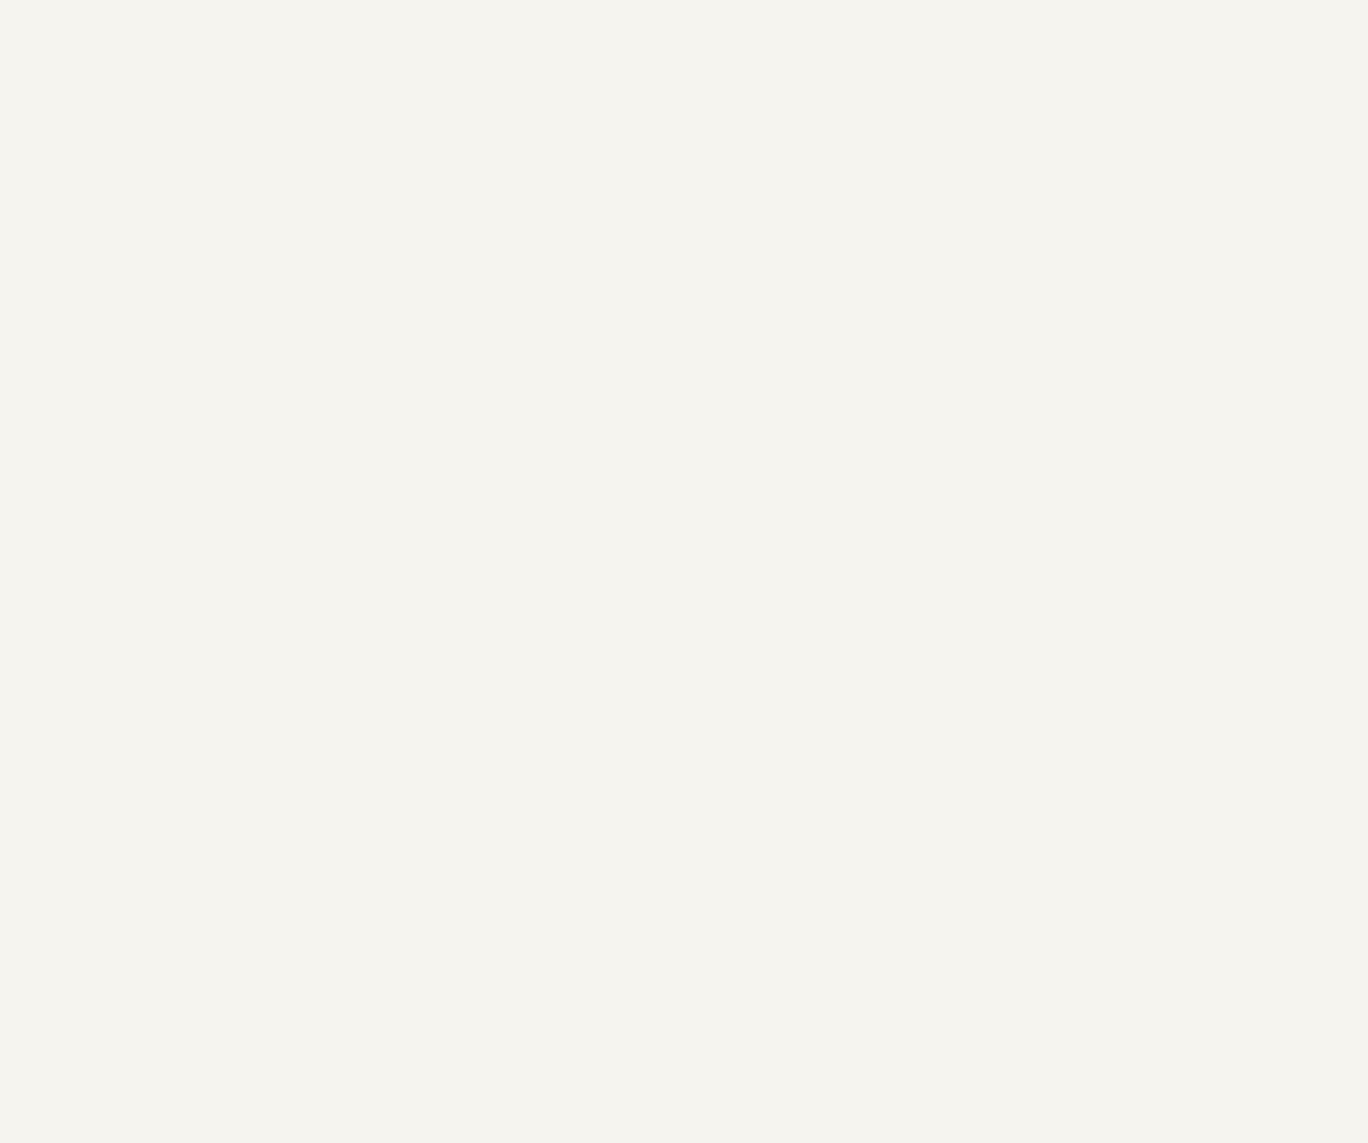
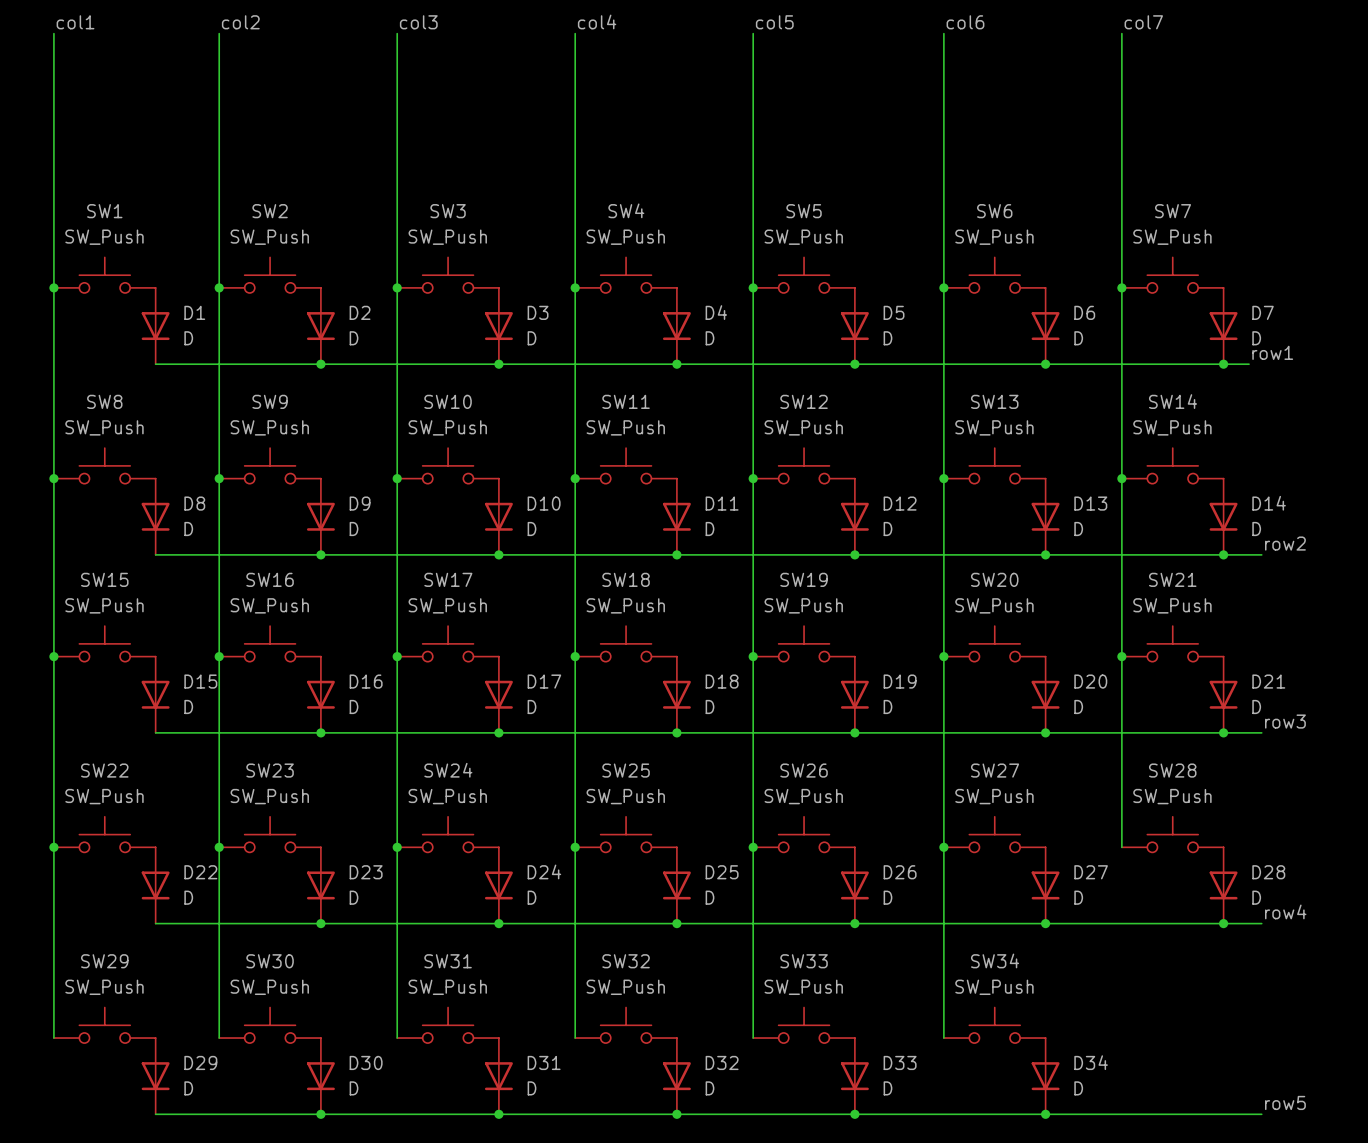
label: none -> col4 (597, 21)
label: none -> col1 (75, 22)
label: none -> col2 (240, 22)
label: none -> col3 (418, 22)
label: none -> col5 (774, 22)
label: none -> col6 (965, 22)
label: none -> col7 (1143, 22)
wire: none -> (53, 33) (53, 1038)
wire: none -> (219, 33) (219, 1038)
wire: none -> (397, 33) (397, 1038)
wire: none -> (575, 33) (575, 1038)
wire: none -> (753, 33) (753, 1038)
wire: none -> (943, 33) (943, 1038)
wire: none -> (1121, 33) (1121, 847)
SW1: none -> SW_Push (104, 275)
SW2: none -> SW_Push (270, 275)
SW3: none -> SW_Push (448, 275)
SW4: none -> SW_Push (626, 275)
SW5: none -> SW_Push (804, 275)
SW6: none -> SW_Push (994, 275)
SW7: none -> SW_Push (1172, 275)
junction: none -> (53, 287)
junction: none -> (219, 287)
junction: none -> (397, 287)
junction: none -> (575, 287)
junction: none -> (753, 287)
junction: none -> (943, 287)
junction: none -> (1121, 287)
D1: none -> D (155, 326)
D2: none -> D (320, 326)
D3: none -> D (498, 326)
D4: none -> D (676, 326)
D5: none -> D (854, 326)
D6: none -> D (1045, 326)
D7: none -> D (1223, 326)
label: none -> row1 (1272, 352)
wire: none -> (155, 364) (1249, 364)
junction: none -> (320, 364)
junction: none -> (498, 364)
junction: none -> (676, 364)
junction: none -> (854, 364)
junction: none -> (1045, 364)
junction: none -> (1223, 364)
SW8: none -> SW_Push (104, 465)
SW9: none -> SW_Push (270, 465)
SW10: none -> SW_Push (448, 465)
SW11: none -> SW_Push (626, 465)
SW12: none -> SW_Push (804, 465)
SW13: none -> SW_Push (994, 465)
SW14: none -> SW_Push (1172, 465)
junction: none -> (53, 478)
junction: none -> (219, 478)
junction: none -> (397, 478)
junction: none -> (575, 478)
junction: none -> (753, 478)
junction: none -> (943, 478)
junction: none -> (1121, 478)
D8: none -> D (155, 516)
D9: none -> D (320, 516)
D10: none -> D (498, 516)
D11: none -> D (676, 516)
D12: none -> D (854, 516)
D13: none -> D (1045, 516)
D14: none -> D (1223, 516)
label: none -> row2 (1285, 543)
wire: none -> (155, 554) (1261, 554)
junction: none -> (320, 554)
junction: none -> (498, 554)
junction: none -> (676, 554)
junction: none -> (854, 554)
junction: none -> (1045, 554)
junction: none -> (1223, 554)
SW15: none -> SW_Push (104, 643)
SW16: none -> SW_Push (270, 643)
SW17: none -> SW_Push (448, 643)
SW18: none -> SW_Push (626, 643)
SW19: none -> SW_Push (804, 643)
SW20: none -> SW_Push (994, 643)
SW21: none -> SW_Push (1172, 643)
junction: none -> (53, 656)
junction: none -> (219, 656)
junction: none -> (397, 656)
junction: none -> (575, 656)
junction: none -> (753, 656)
junction: none -> (943, 656)
junction: none -> (1121, 656)
D15: none -> D (155, 694)
D16: none -> D (320, 694)
D17: none -> D (498, 694)
D18: none -> D (676, 694)
D19: none -> D (854, 694)
D20: none -> D (1045, 694)
D21: none -> D (1223, 694)
label: none -> row3 (1285, 721)
wire: none -> (155, 732) (1261, 732)
junction: none -> (320, 732)
junction: none -> (498, 732)
junction: none -> (676, 732)
junction: none -> (854, 732)
junction: none -> (1045, 732)
junction: none -> (1223, 732)
SW22: none -> SW_Push (104, 834)
SW23: none -> SW_Push (270, 834)
SW24: none -> SW_Push (448, 834)
SW25: none -> SW_Push (626, 834)
SW26: none -> SW_Push (804, 834)
SW27: none -> SW_Push (994, 834)
SW28: none -> SW_Push (1172, 834)
junction: none -> (53, 847)
junction: none -> (219, 847)
junction: none -> (397, 847)
junction: none -> (575, 847)
junction: none -> (753, 847)
junction: none -> (943, 847)
D22: none -> D (155, 885)
D23: none -> D (320, 885)
D24: none -> D (498, 885)
D25: none -> D (676, 885)
D26: none -> D (854, 885)
D27: none -> D (1045, 885)
D28: none -> D (1223, 885)
label: none -> row4 (1285, 911)
wire: none -> (155, 923) (1261, 923)
junction: none -> (320, 923)
junction: none -> (498, 923)
junction: none -> (676, 923)
junction: none -> (854, 923)
junction: none -> (1045, 923)
junction: none -> (1223, 923)
SW29: none -> SW_Push (104, 1025)
SW30: none -> SW_Push (270, 1025)
SW31: none -> SW_Push (448, 1025)
SW32: none -> SW_Push (626, 1025)
SW33: none -> SW_Push (804, 1025)
SW34: none -> SW_Push (994, 1025)
D29: none -> D (155, 1076)
D30: none -> D (320, 1076)
D31: none -> D (498, 1076)
D32: none -> D (676, 1076)
D33: none -> D (854, 1076)
D34: none -> D (1045, 1076)
label: none -> row5 (1285, 1102)
wire: none -> (155, 1114) (1261, 1114)
junction: none -> (320, 1114)
junction: none -> (498, 1114)
junction: none -> (676, 1114)
junction: none -> (854, 1114)
junction: none -> (1045, 1114)

